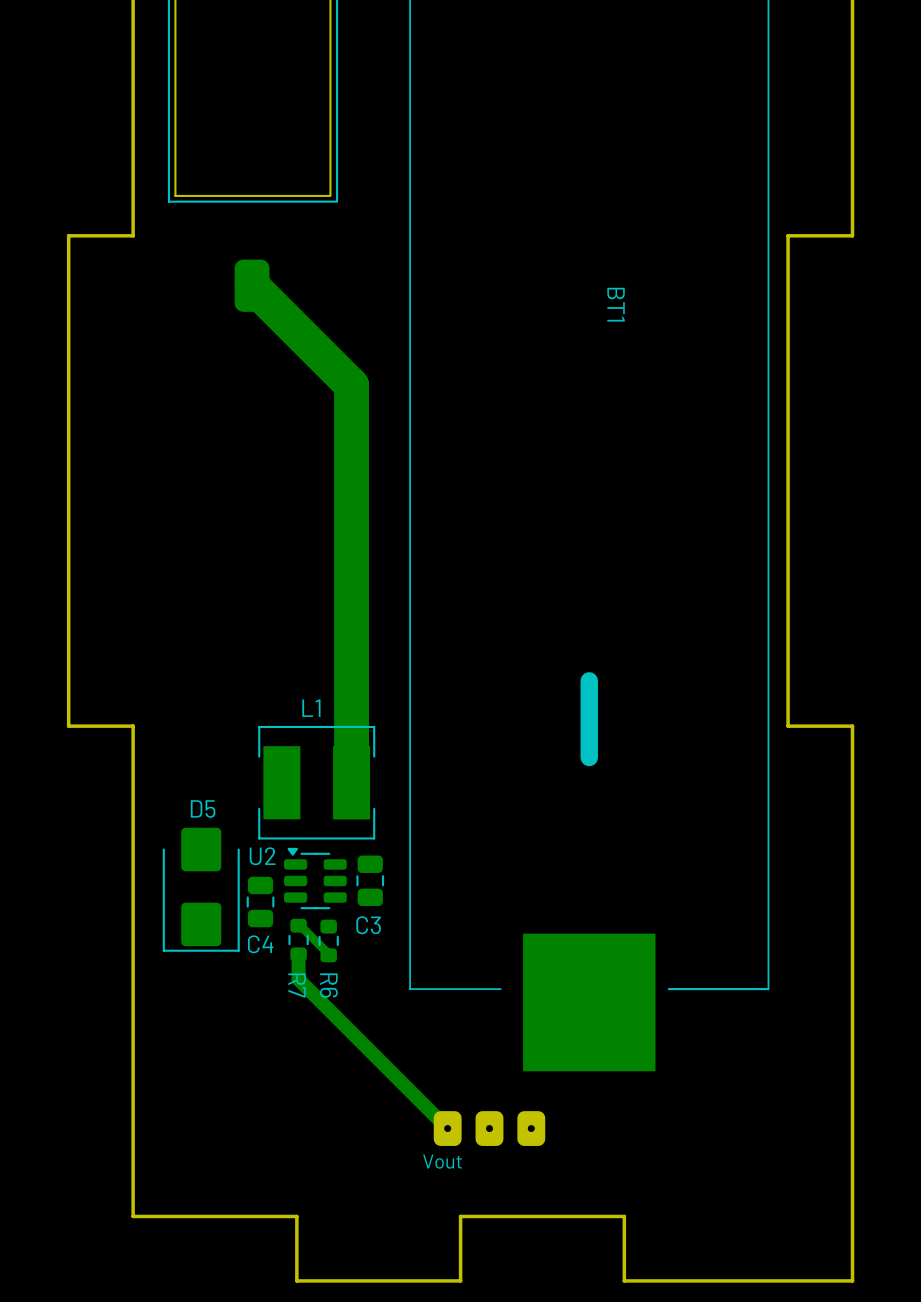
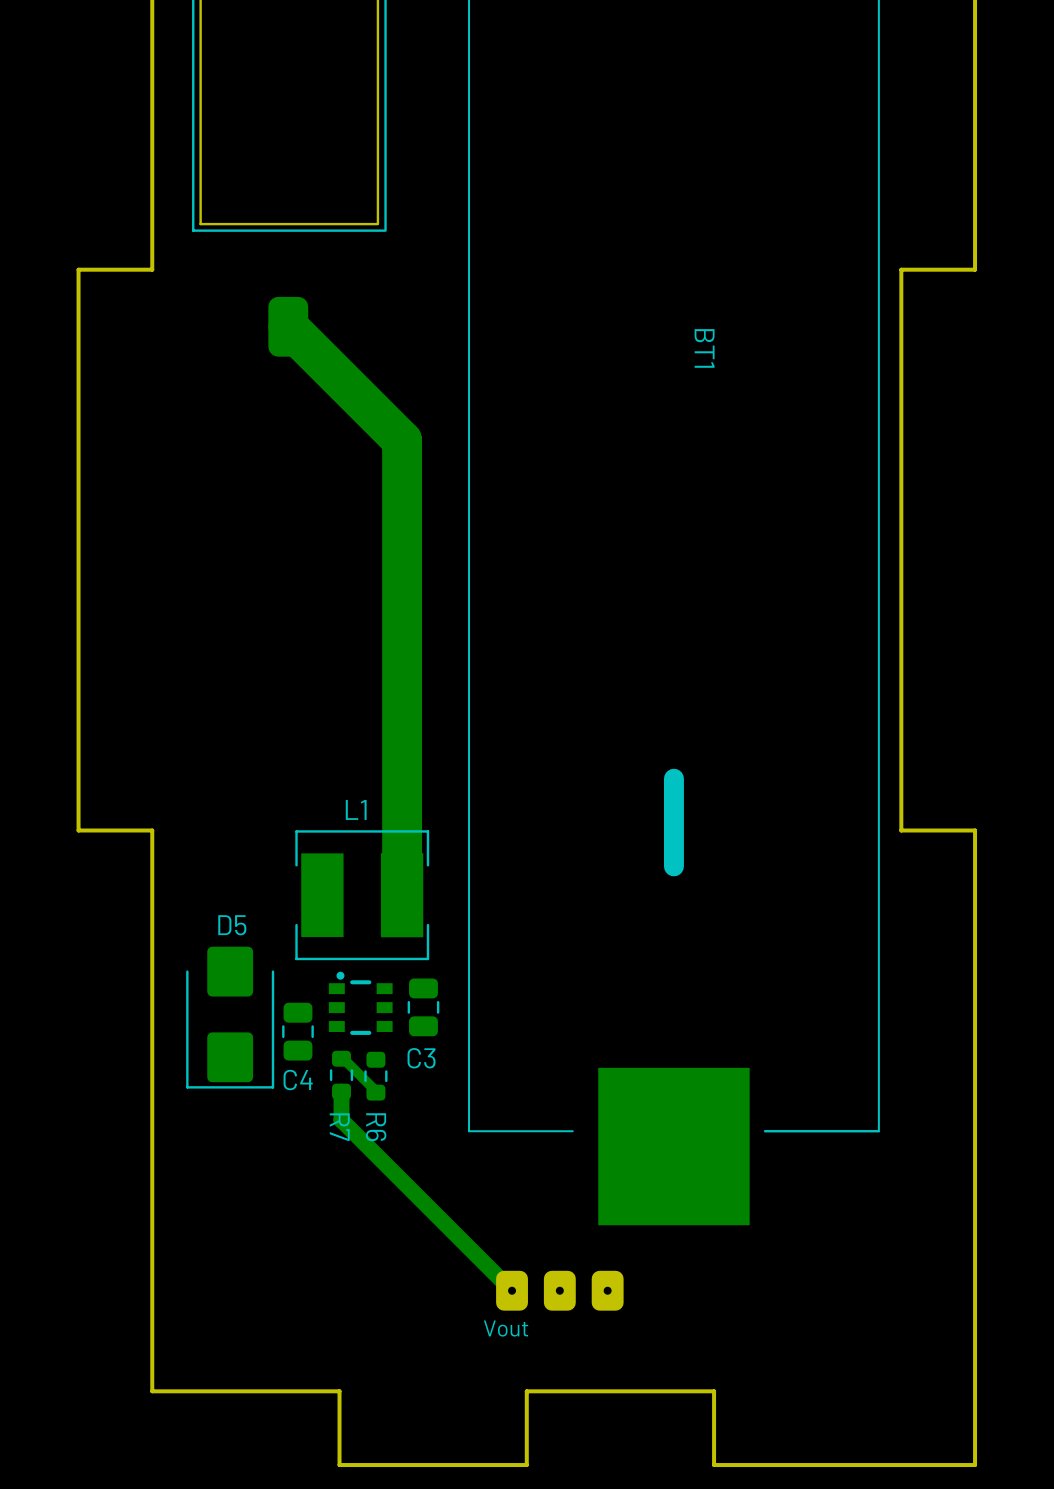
part: none -> (360, 1003)
U2: (315, 878) -> none

